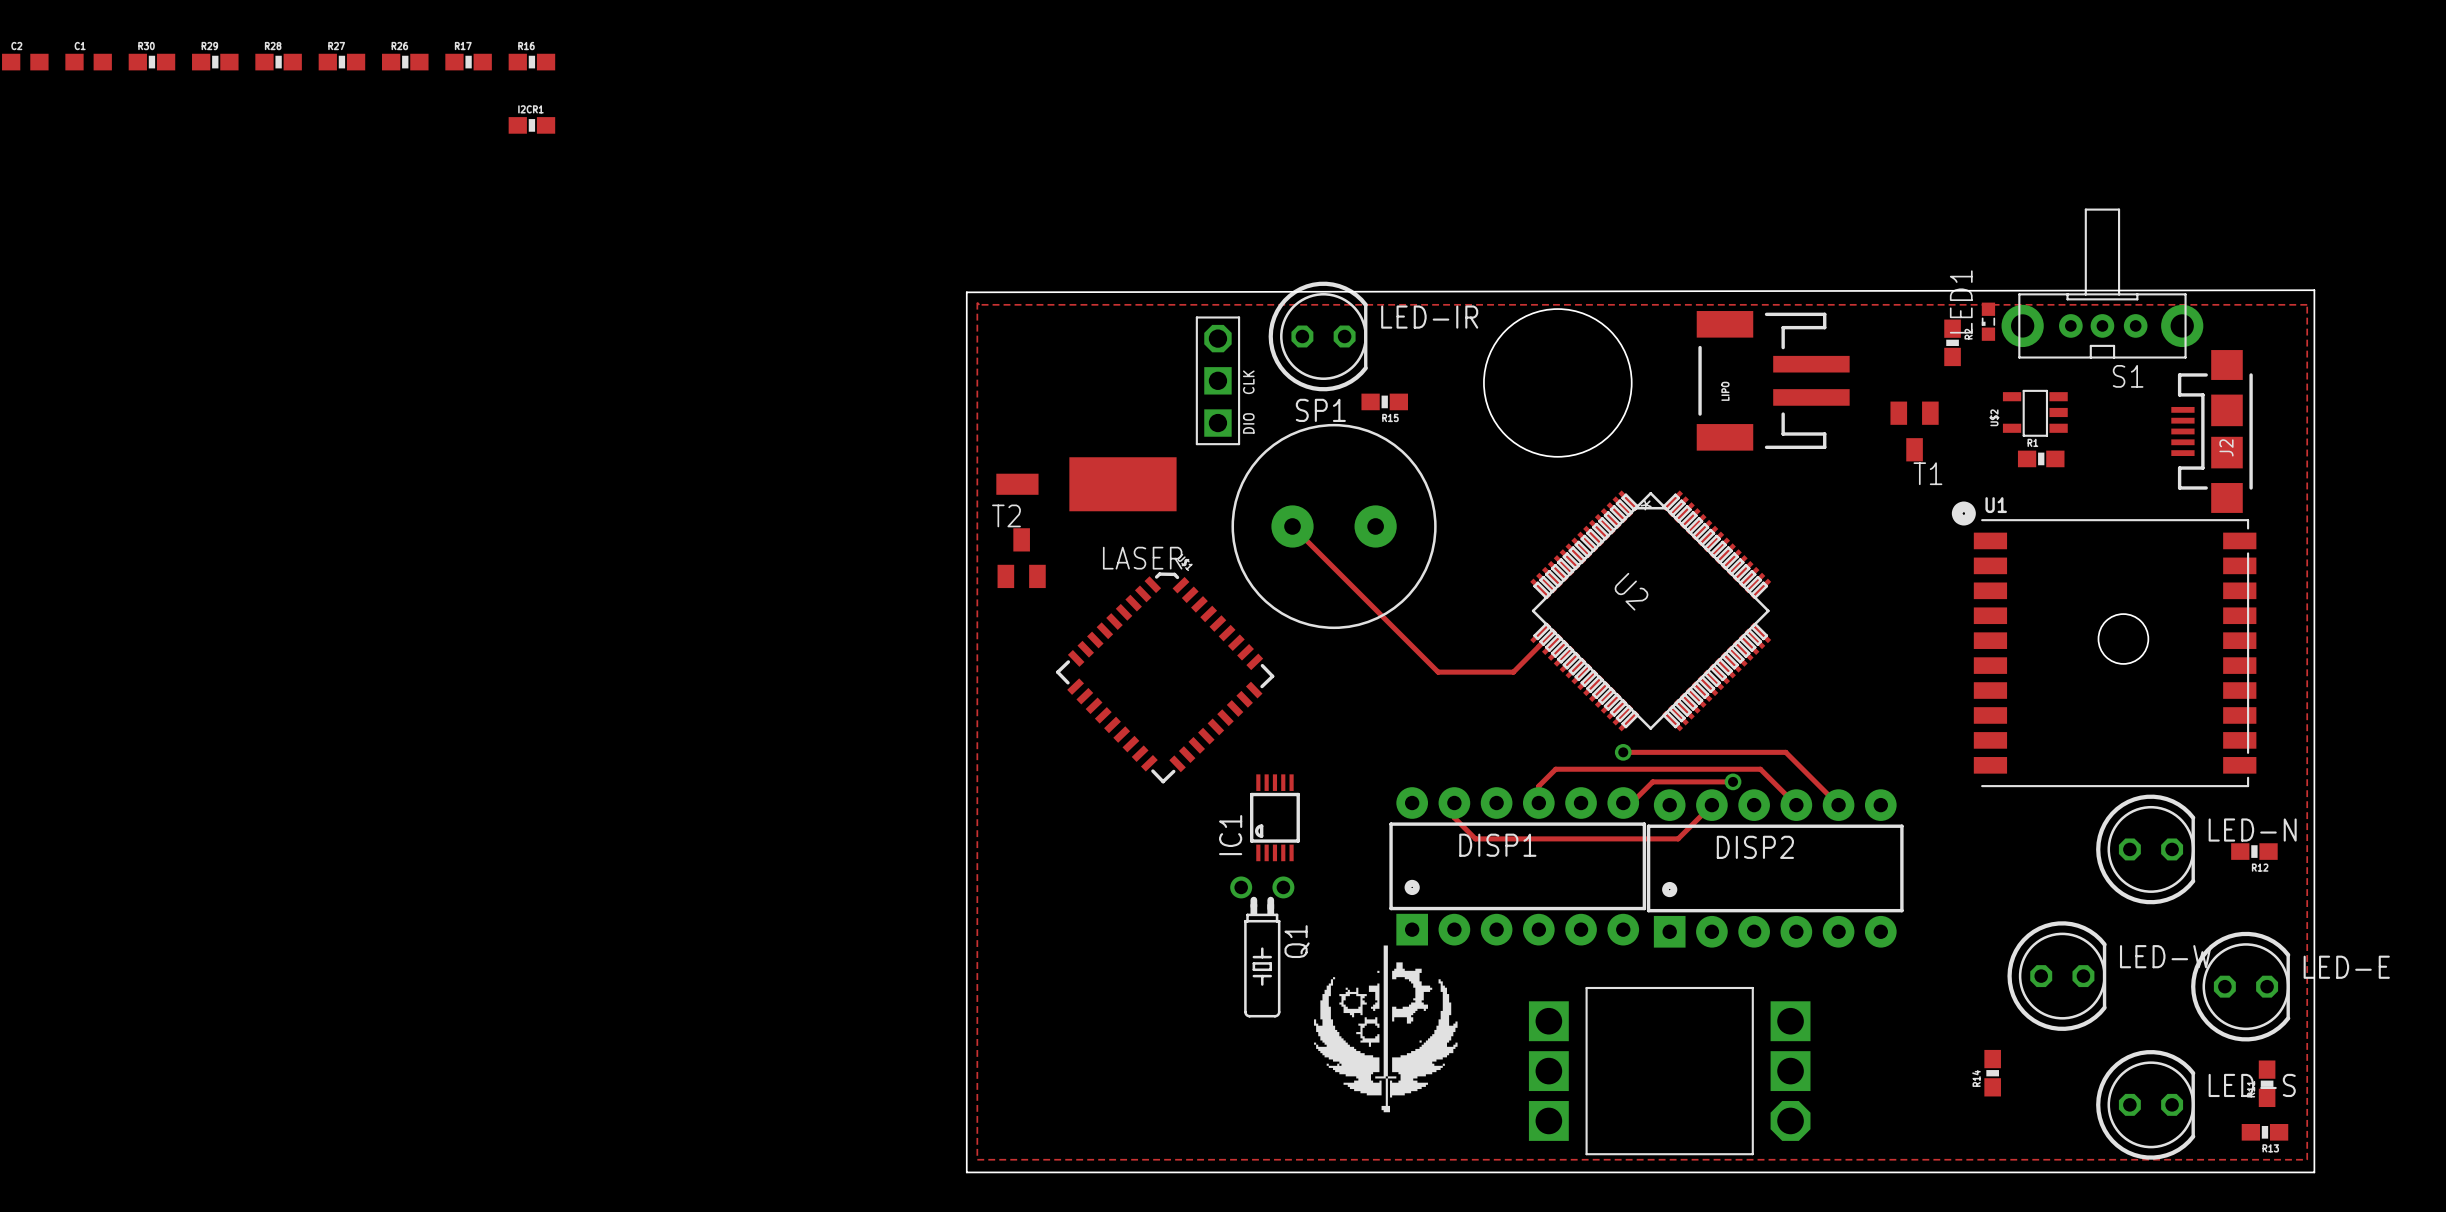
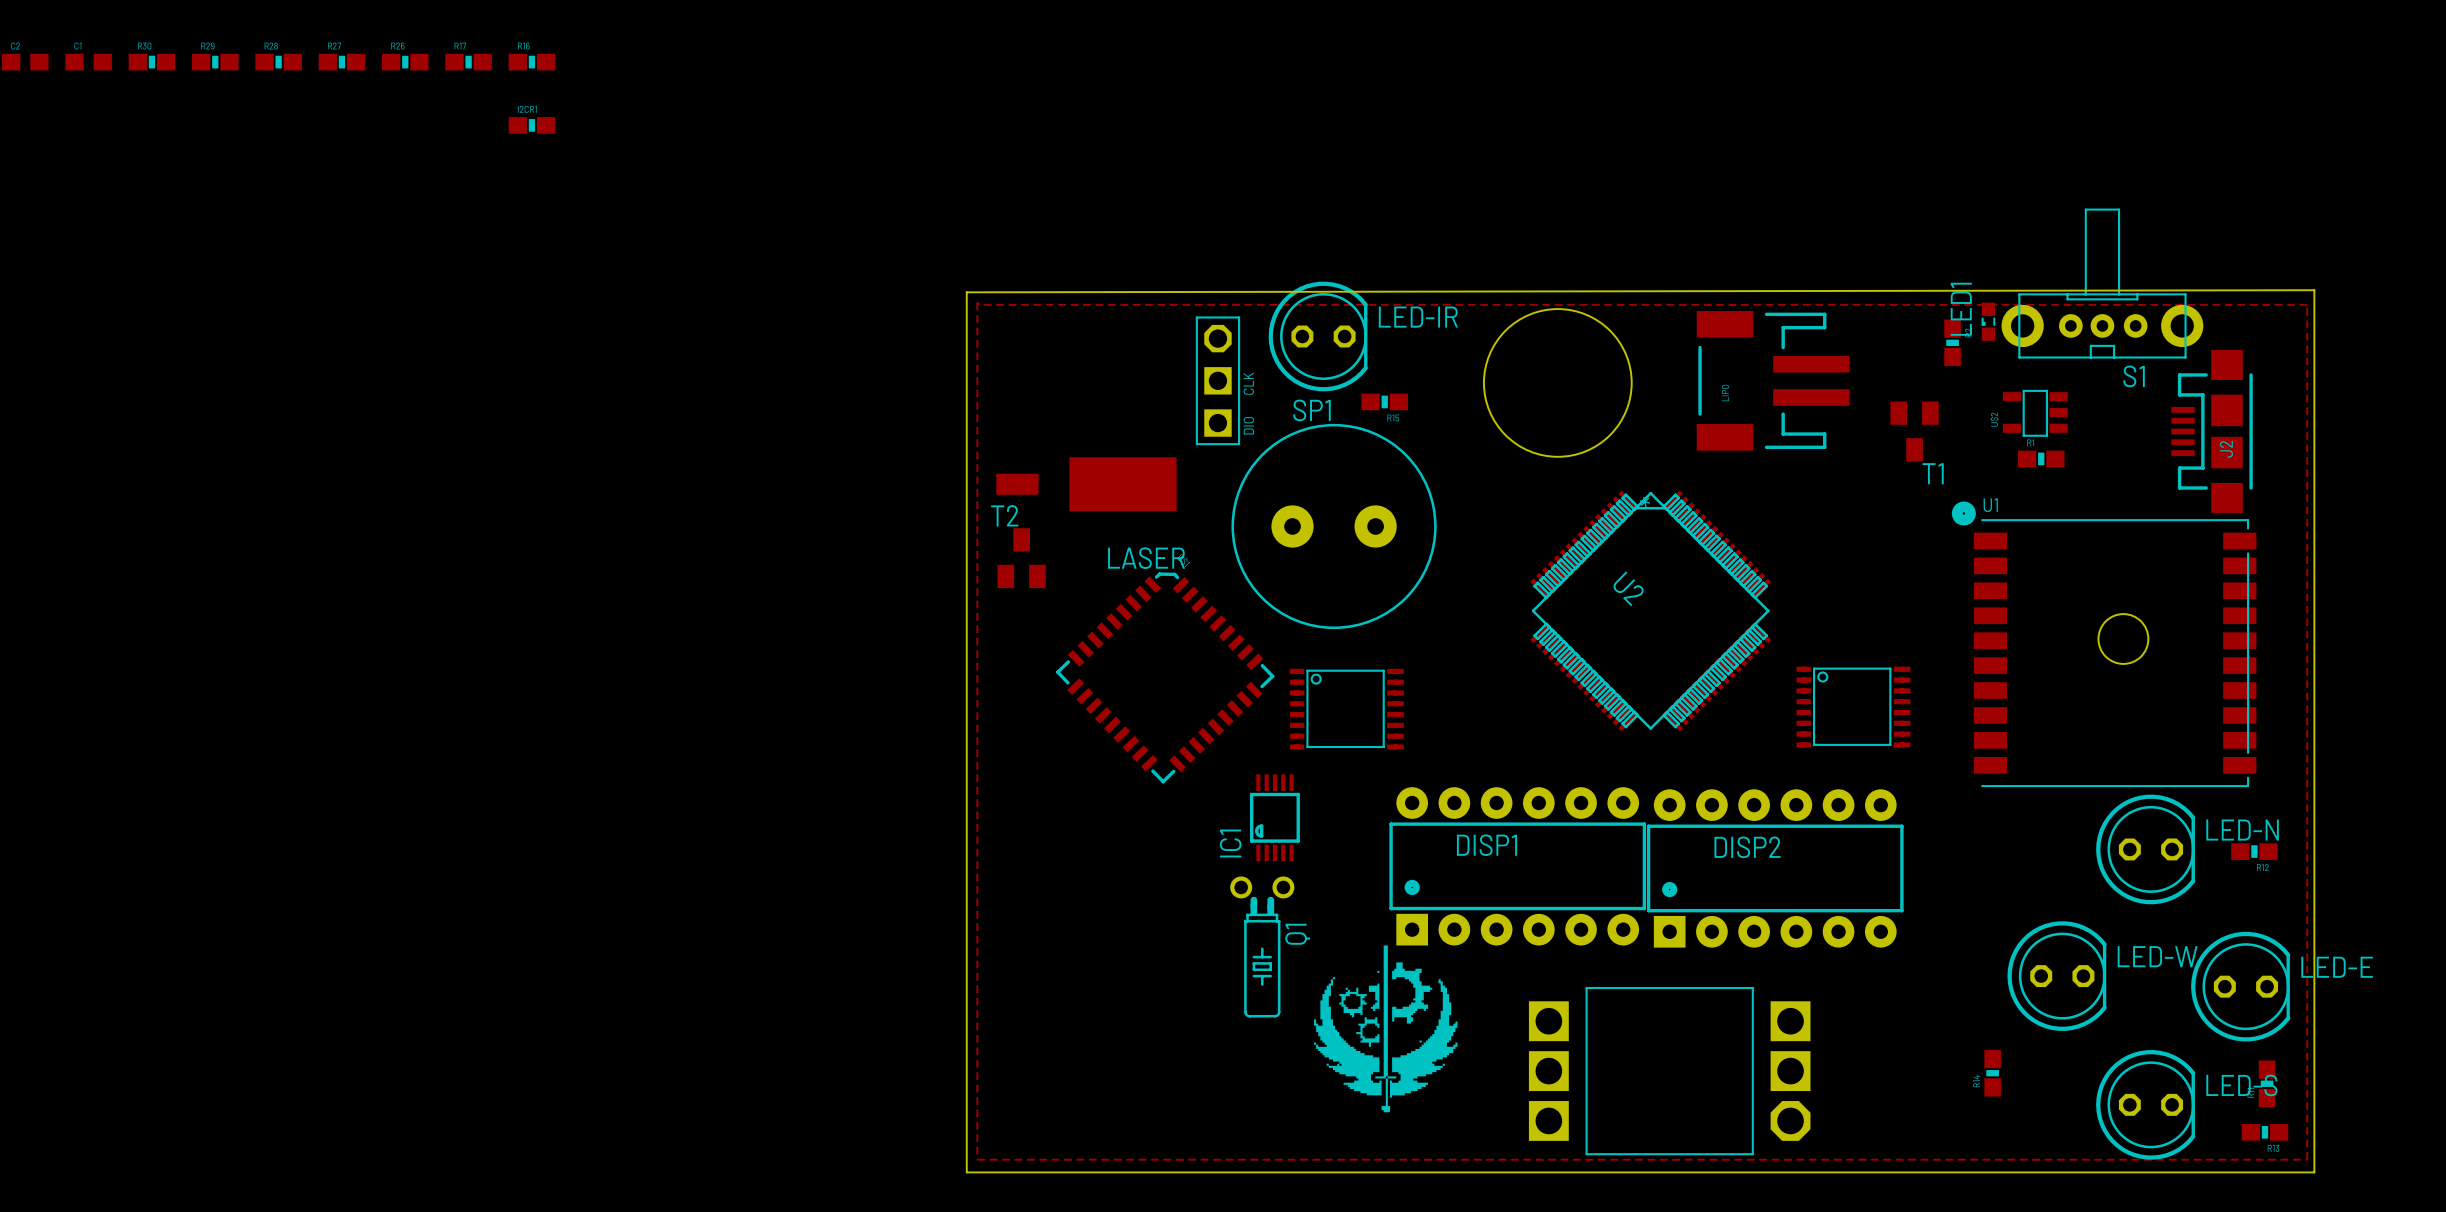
track: (1292, 526) (1438, 672) (1513, 672) (1546, 638) -> none
part: none -> (1853, 707)
part: none -> (1346, 709)
track: (1623, 752) (1785, 752) (1838, 805) -> none
via: (1623, 752) -> none
track: (1733, 781) (1652, 781) (1631, 803) (1623, 803) -> none
via: (1733, 781) -> none
track: (1454, 803) (1454, 817) (1475, 838) (1678, 838) (1711, 805) -> none
track: (1538, 803) (1538, 786) (1555, 769) (1760, 769) (1796, 805) -> none

